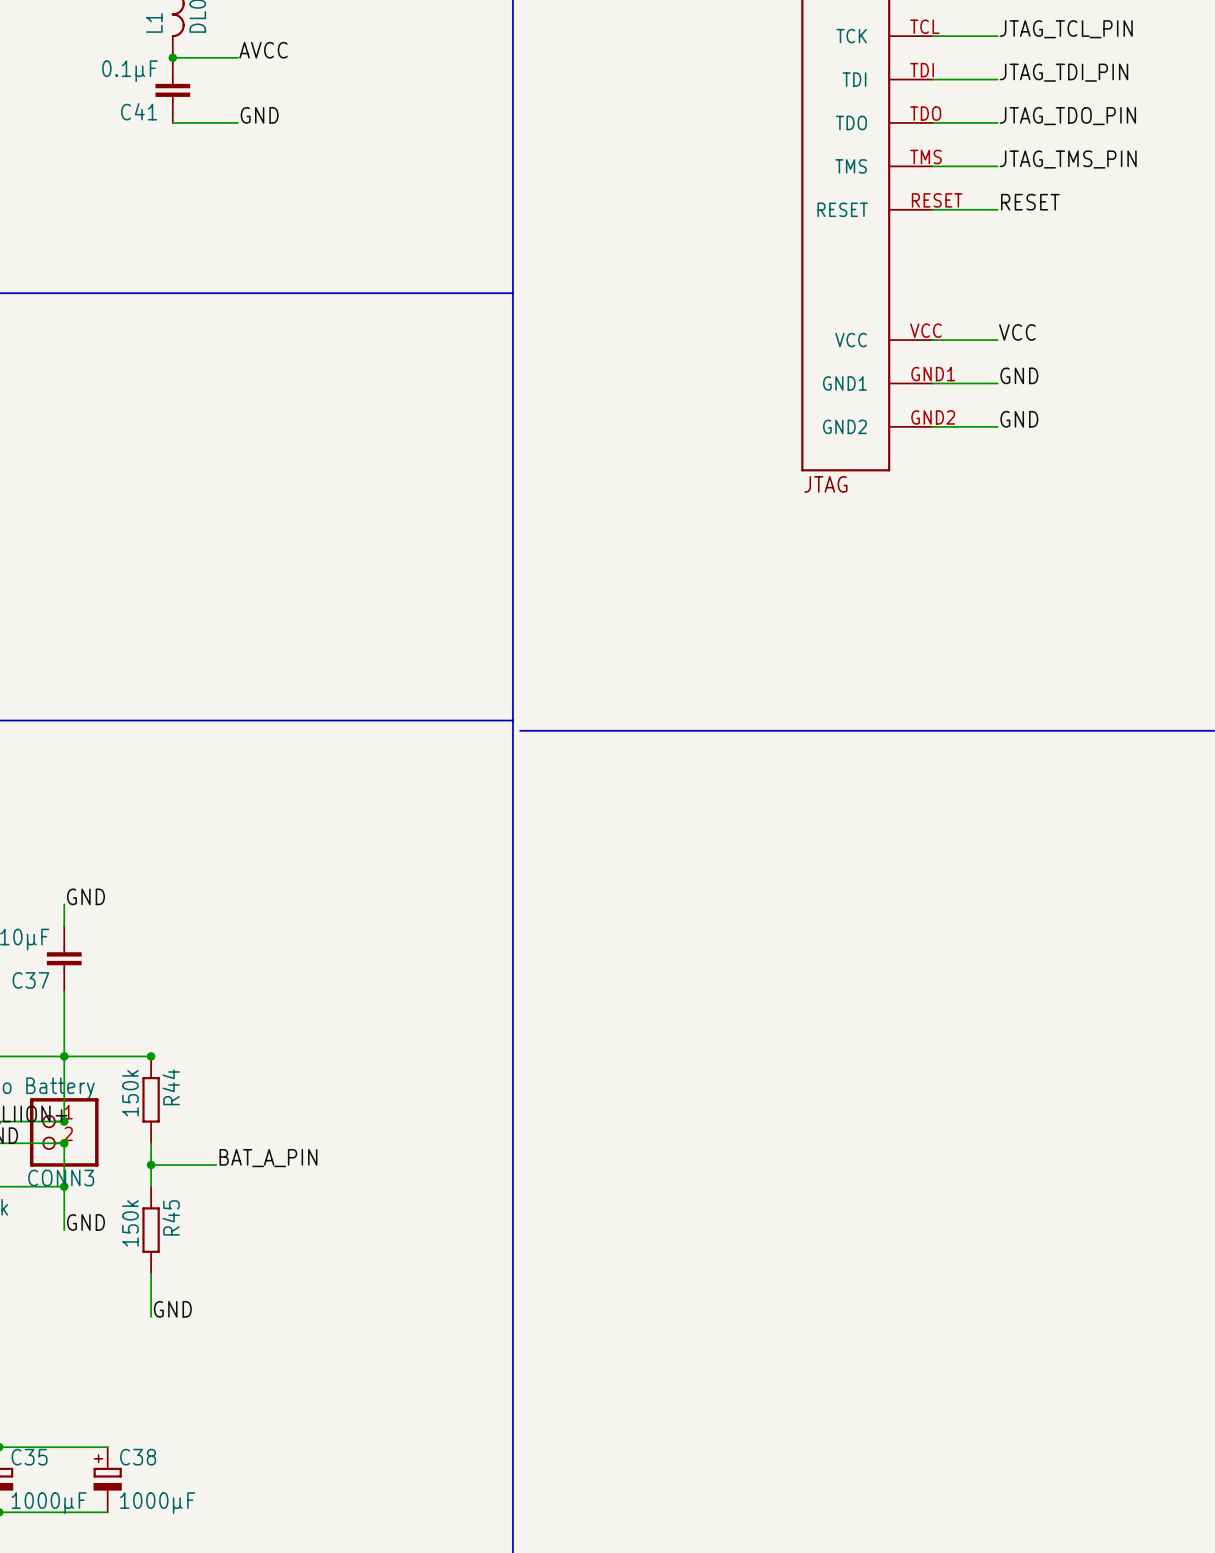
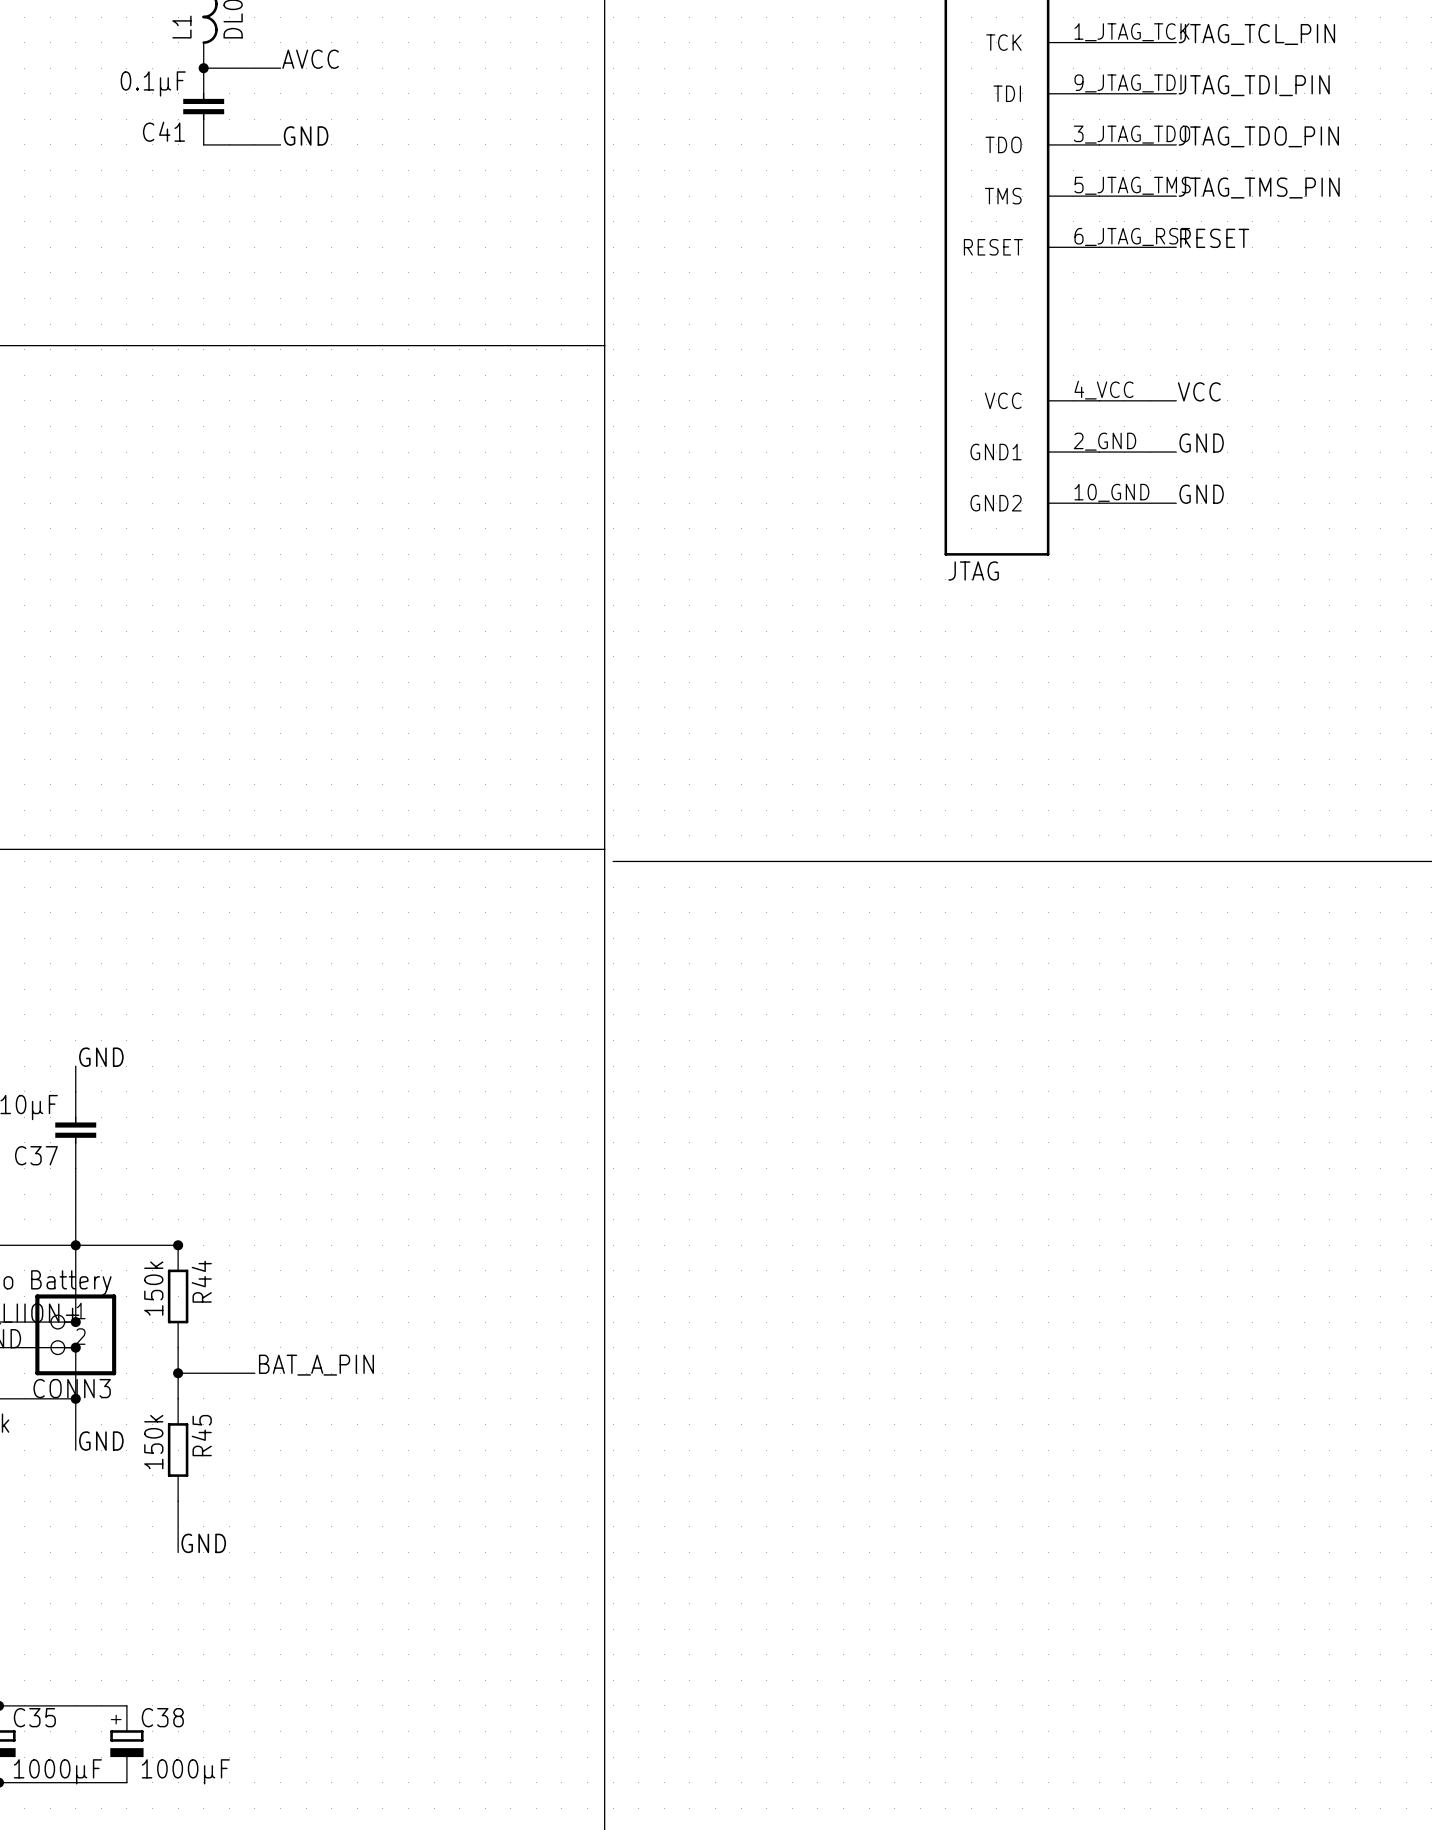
part pin number: TCL (924, 26) -> 1_JTAG_TCK (1131, 32)
part pin number: TDI (922, 70) -> 9_JTAG_TDI (1128, 83)
part pin number: TDO (925, 113) -> 3_JTAG_TDO (1131, 134)
part pin number: TMS (925, 156) -> 5_JTAG_TMS (1132, 185)
part pin number: RESET (937, 200) -> 6_JTAG_RST (1132, 236)
part pin number: VCC (925, 330) -> 4_VCC (1104, 390)
part pin number: GND1 (933, 374) -> 2_GND (1105, 441)
part pin number: GND2 (933, 417) -> 10_GND (1111, 492)

